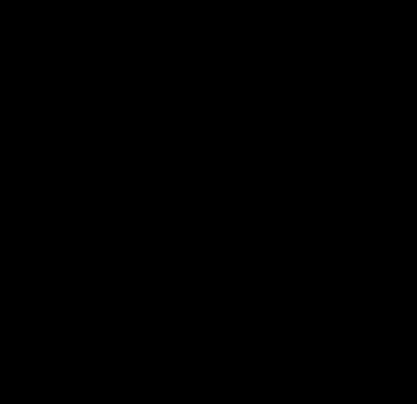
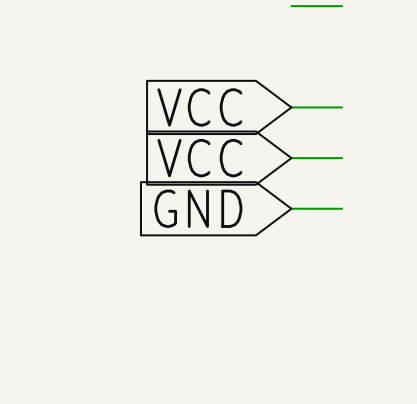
wire: none -> (291, 6) (342, 6)
global label: none -> VCC (199, 107)
wire: none -> (291, 107) (342, 107)
global label: none -> VCC (199, 158)
wire: none -> (291, 158) (342, 158)
global label: none -> GND (198, 208)
wire: none -> (291, 208) (342, 208)

